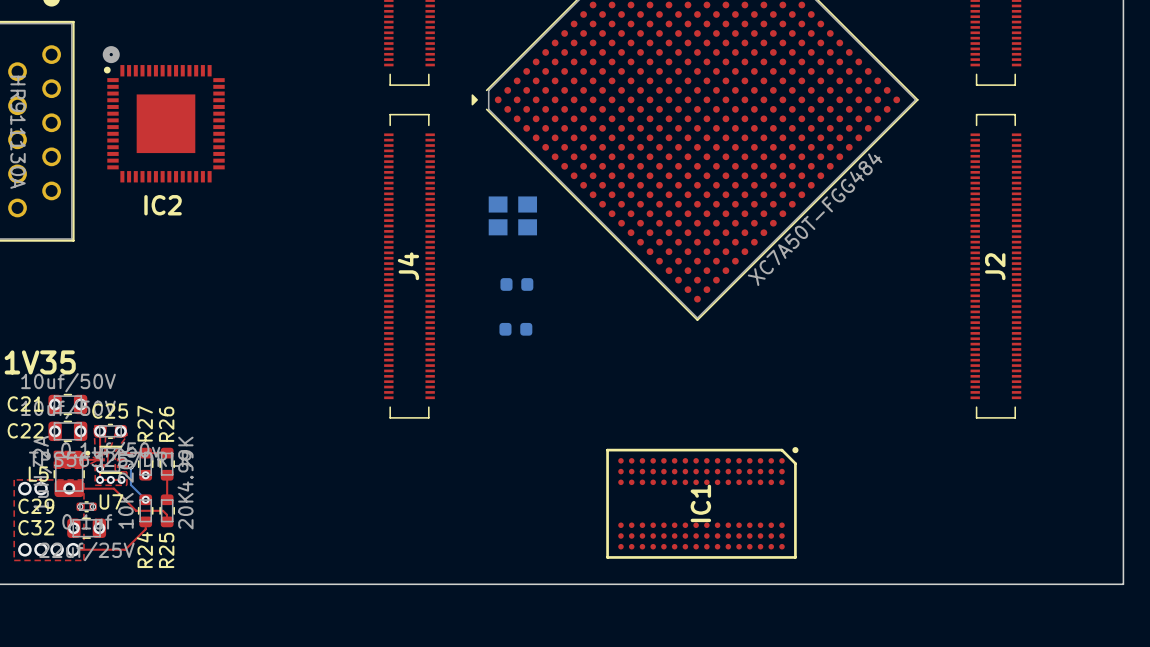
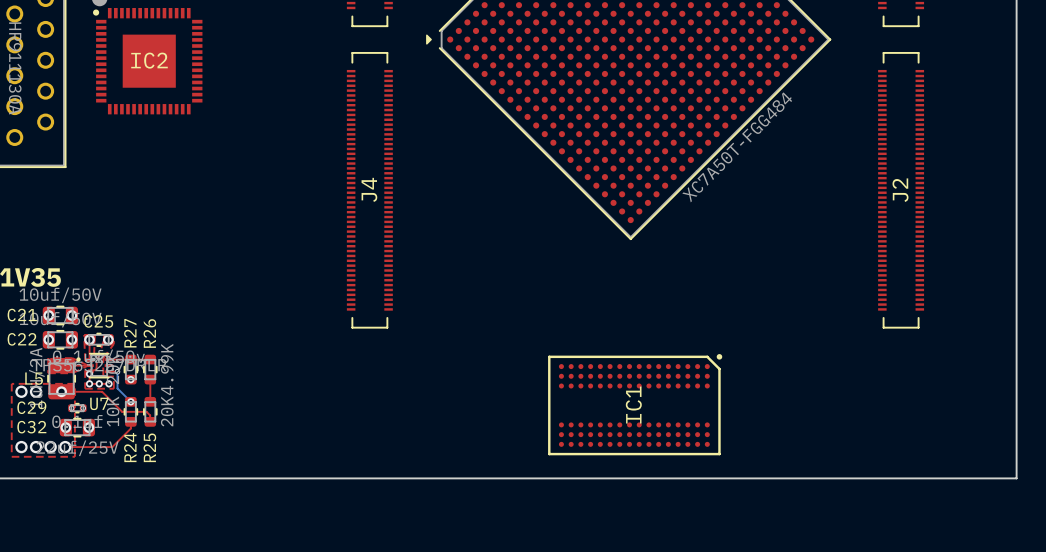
IC2 name position: IC2 (163, 205) -> IC2 (149, 60)
part: (512, 215) -> none
part: (516, 284) -> none
part: (515, 329) -> none

